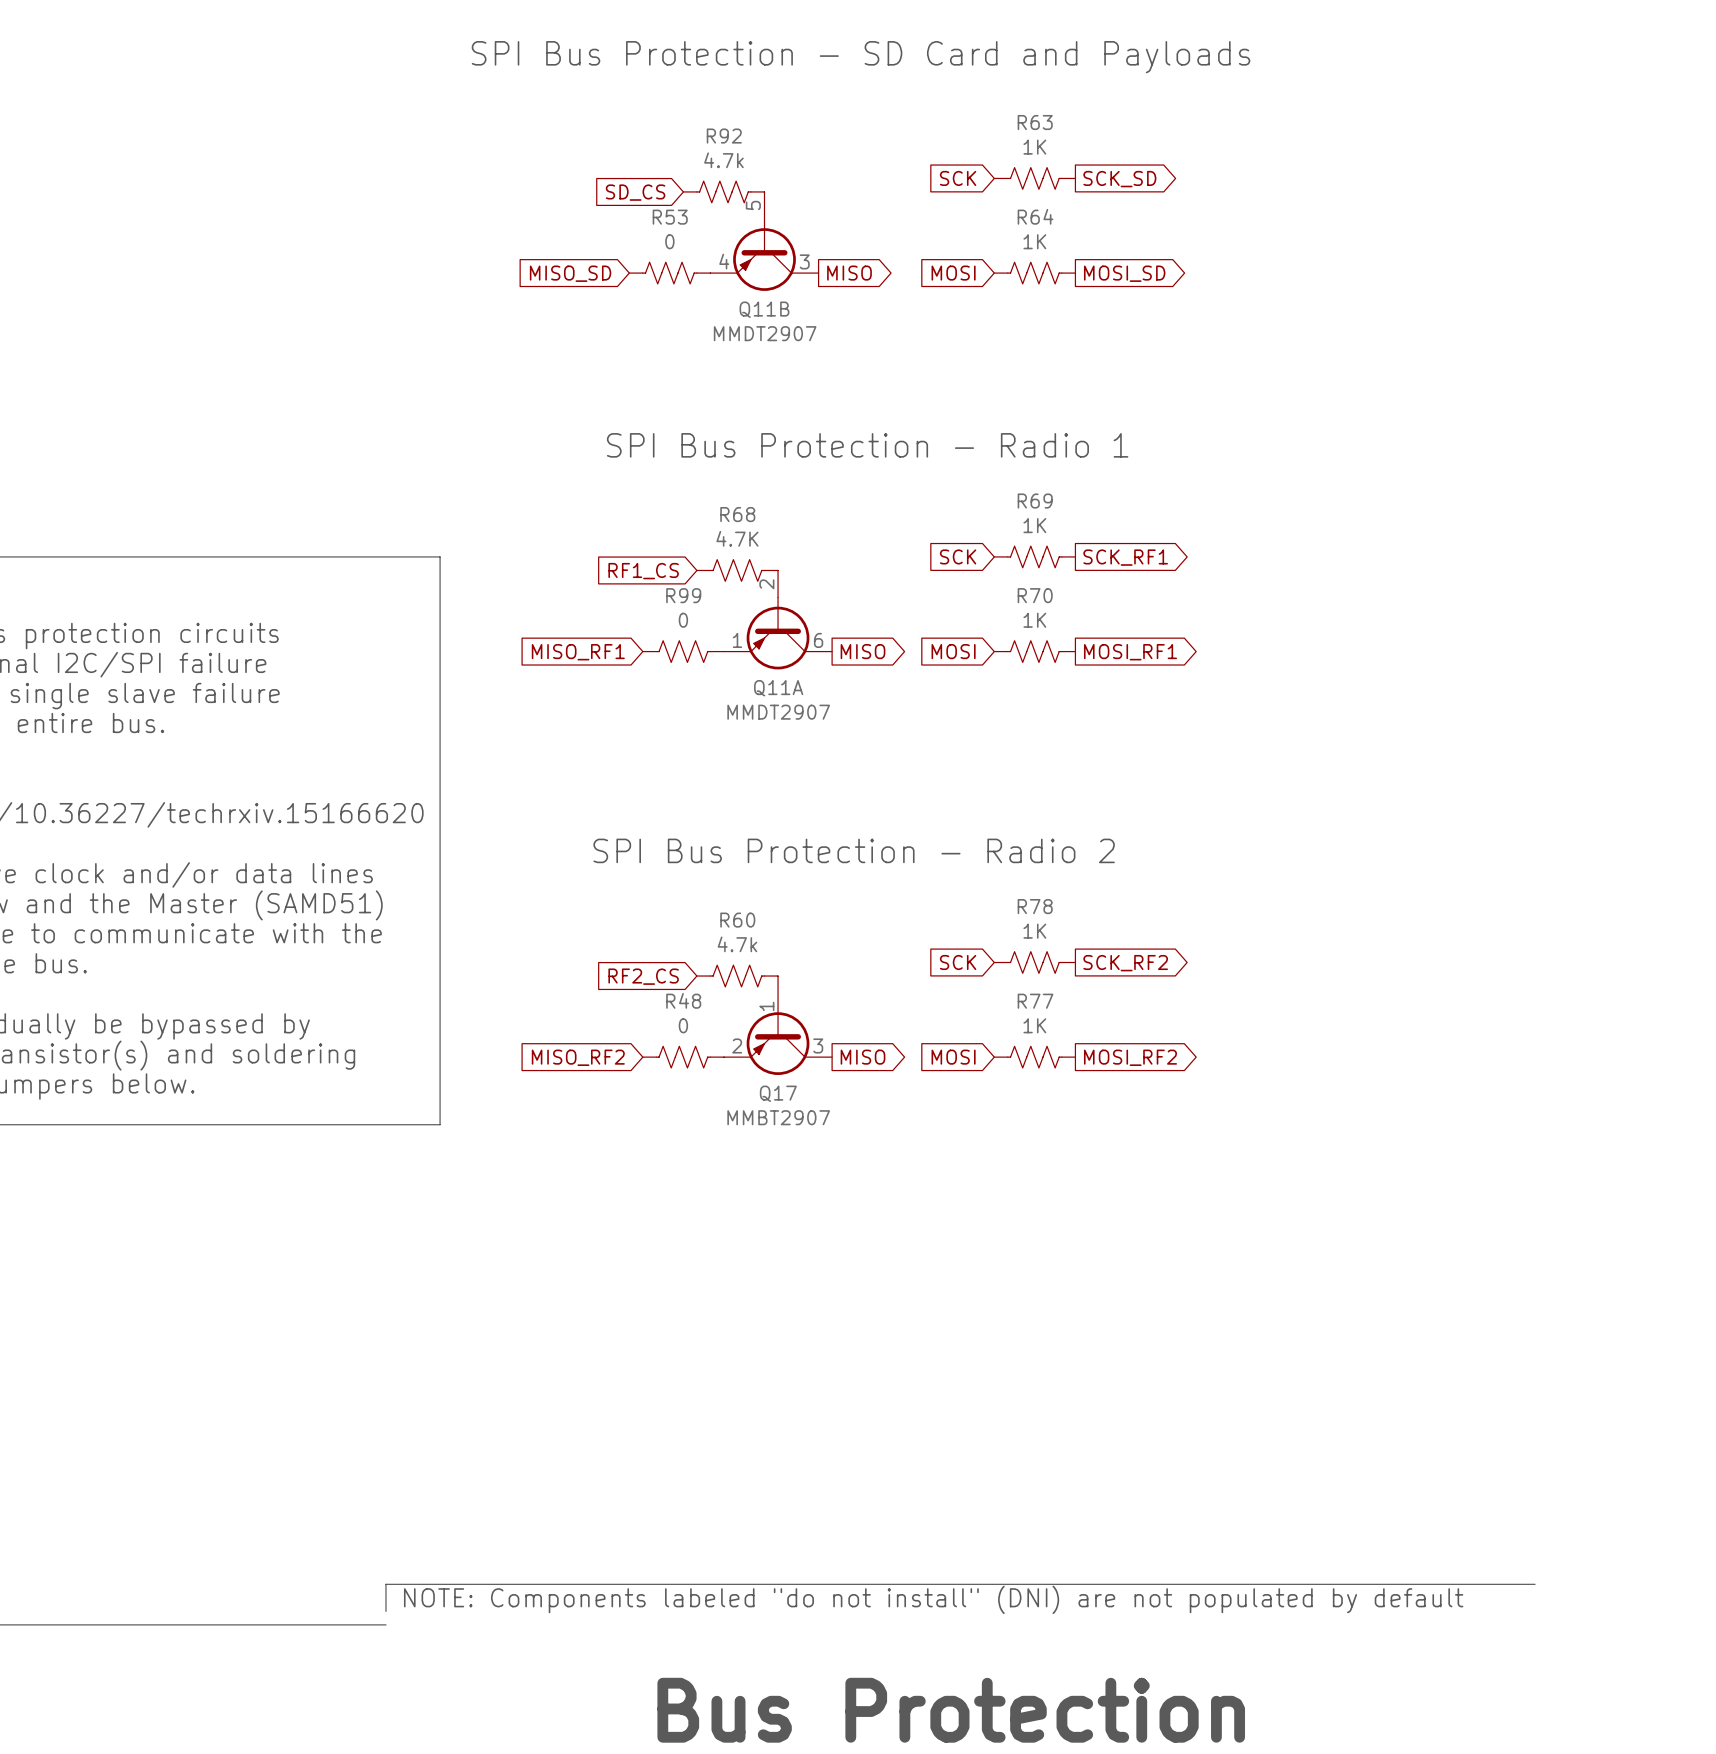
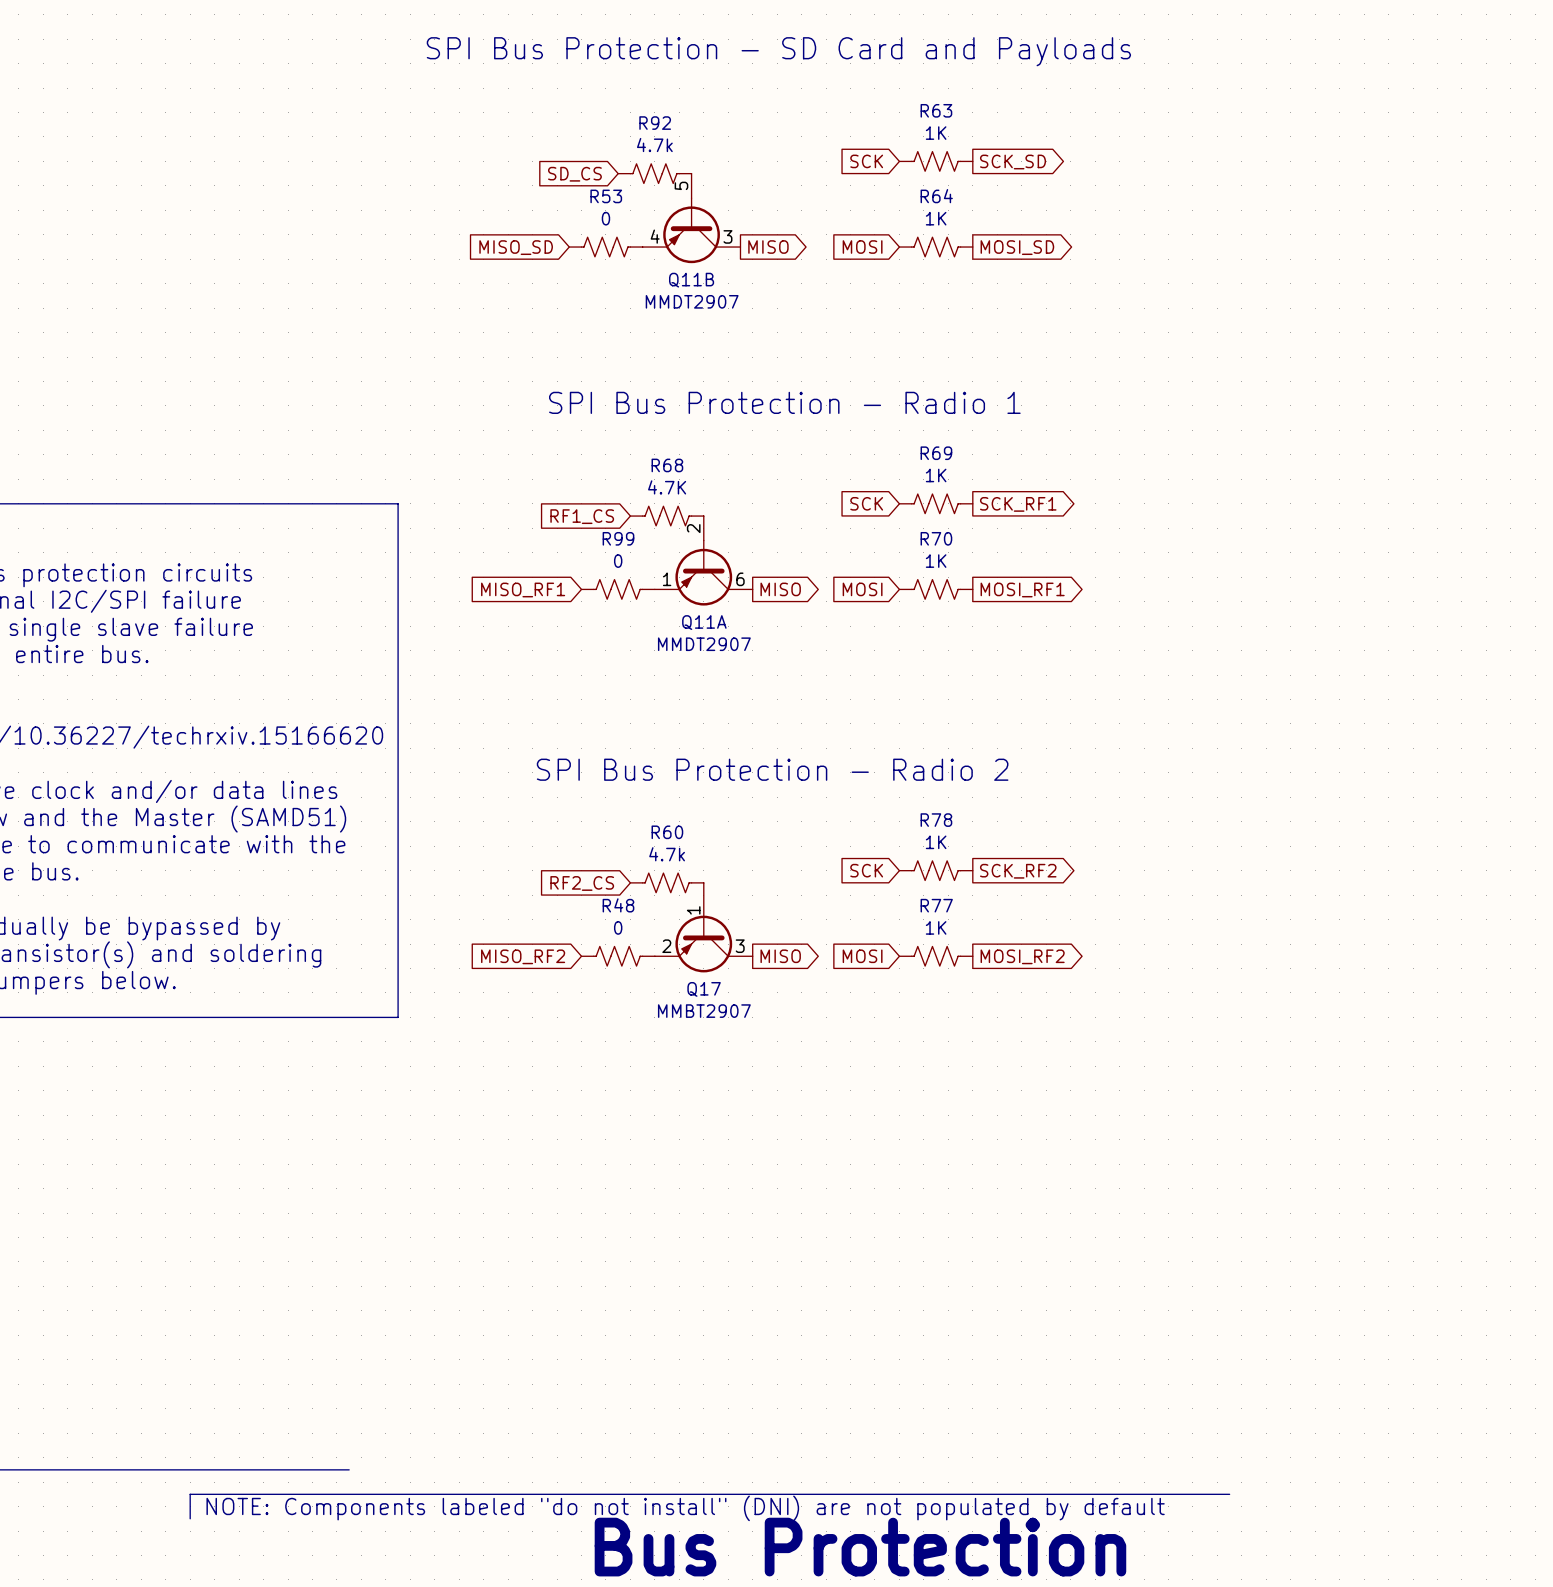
line: (1535, 1584) (385, 1584) (385, 1611) -> (1229, 1494) (190, 1494) (190, 1518)
text position: NOTE: Components labeled "do not install" (DNI) are not populated by default (933, 1599) -> NOTE: Components labeled "do not install" (DNI) are not populated by default (685, 1508)

